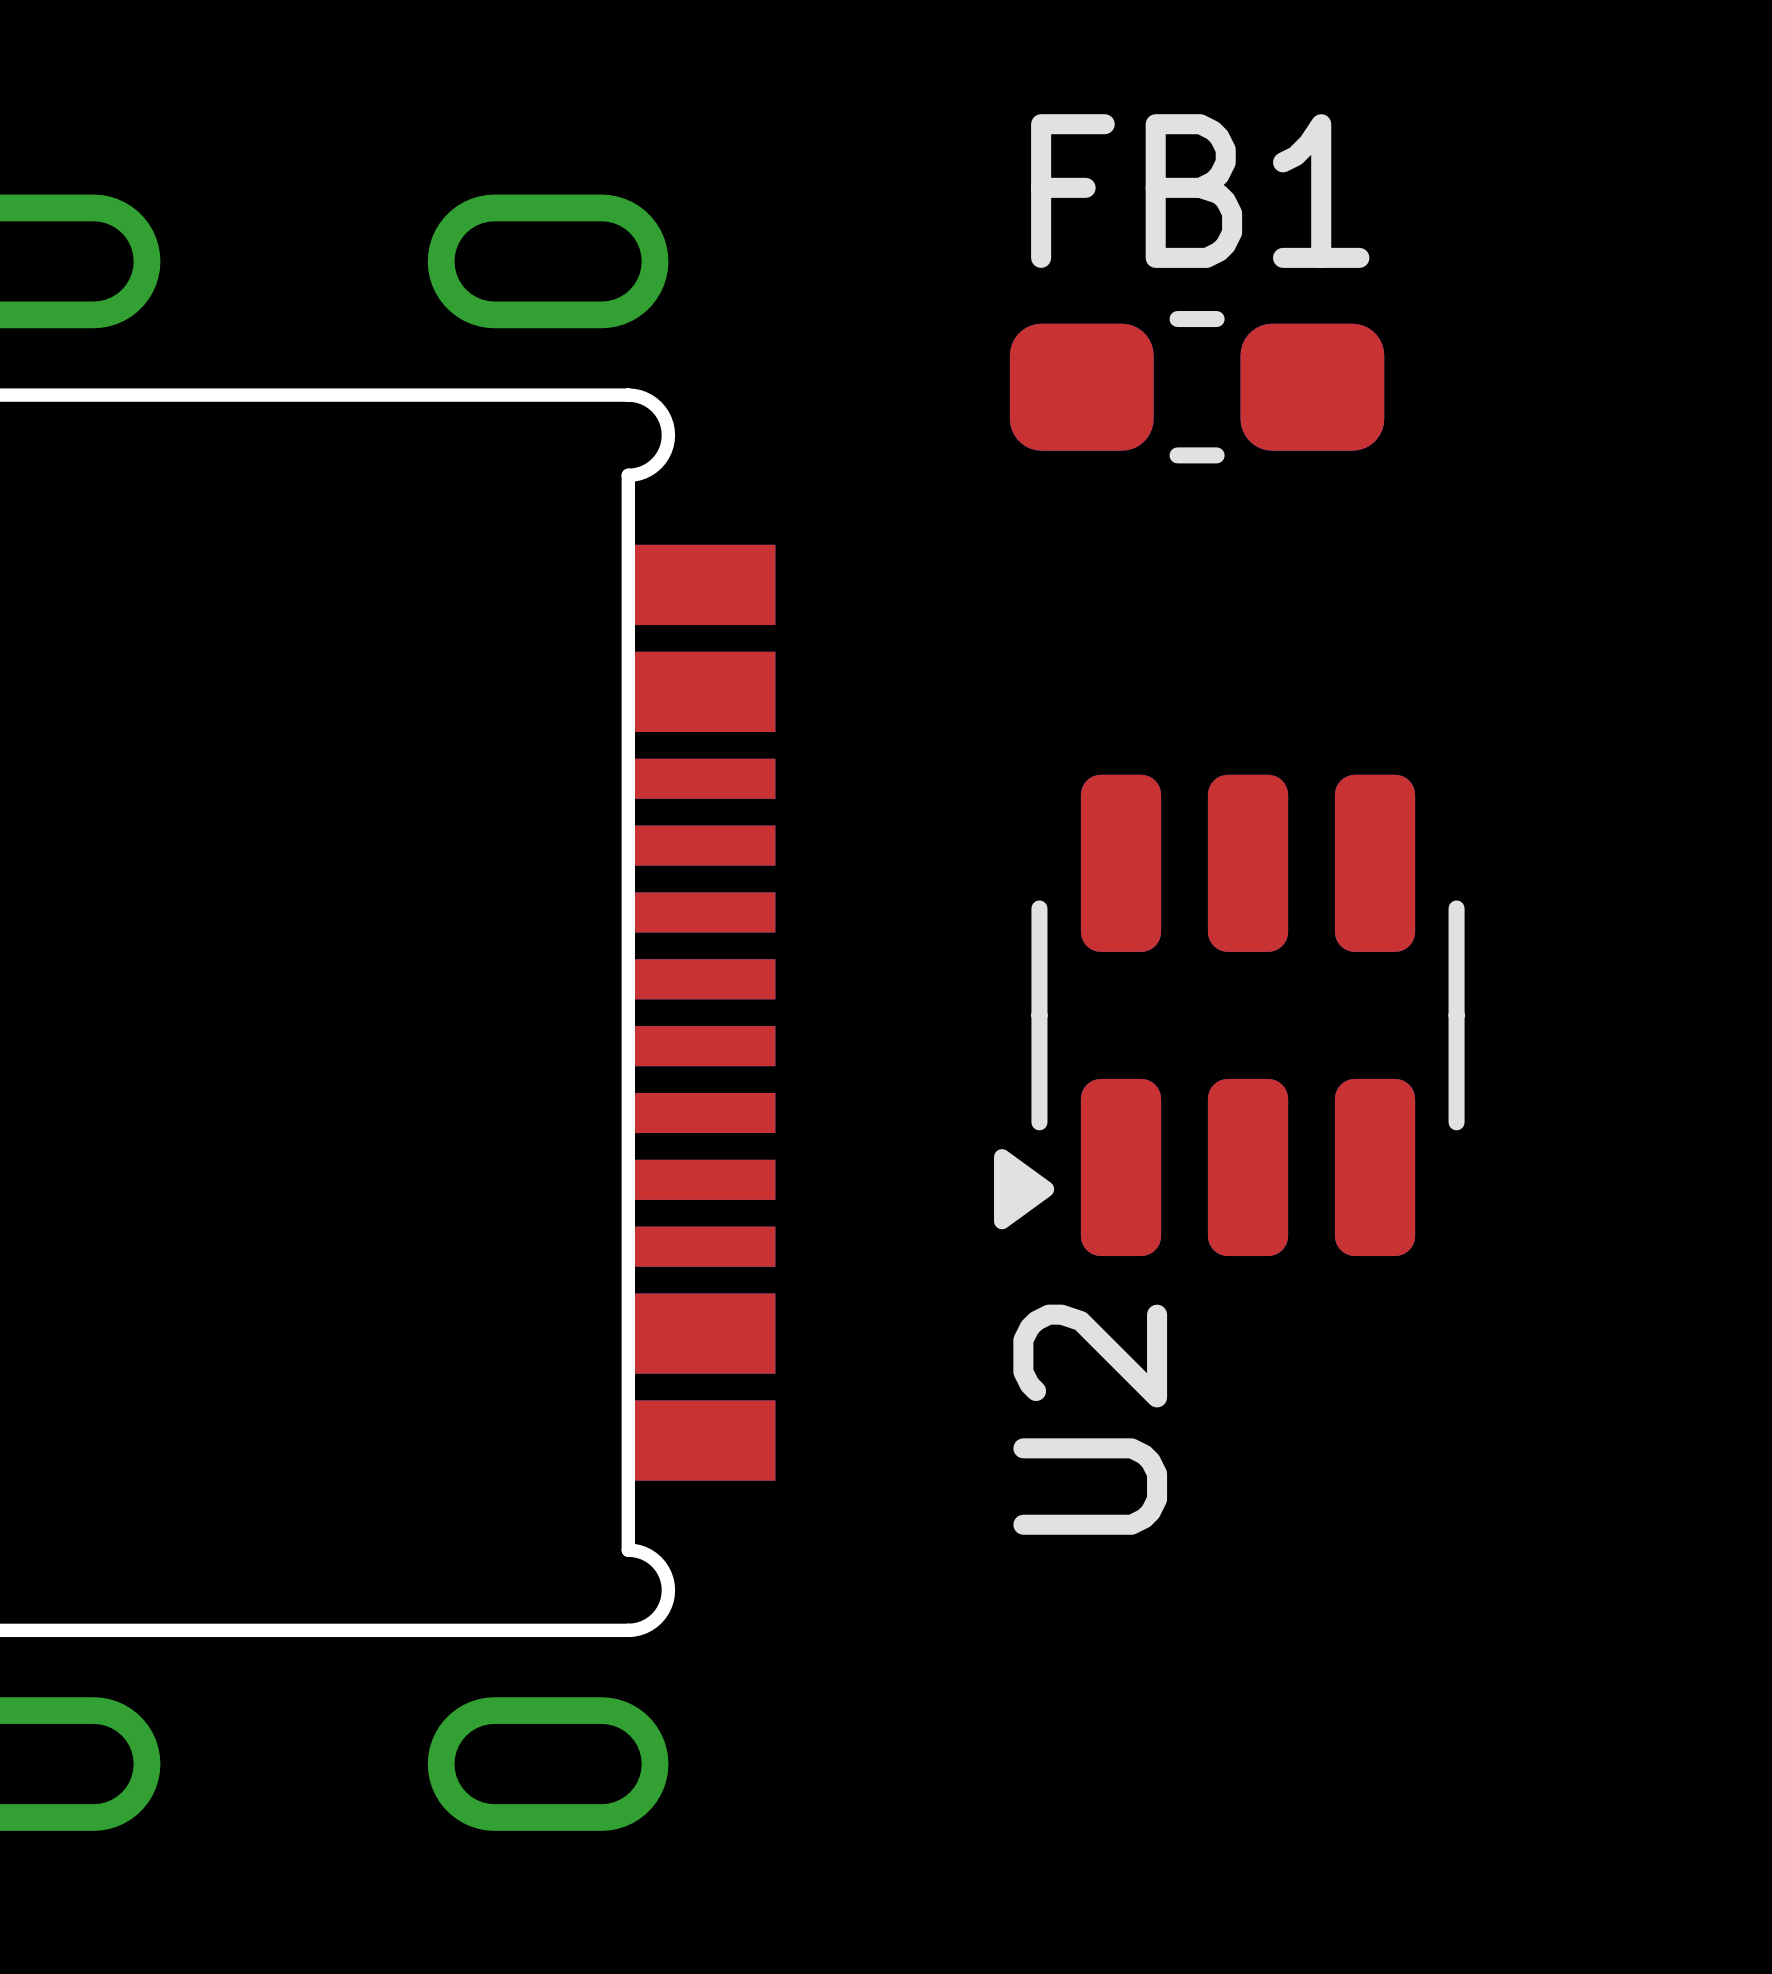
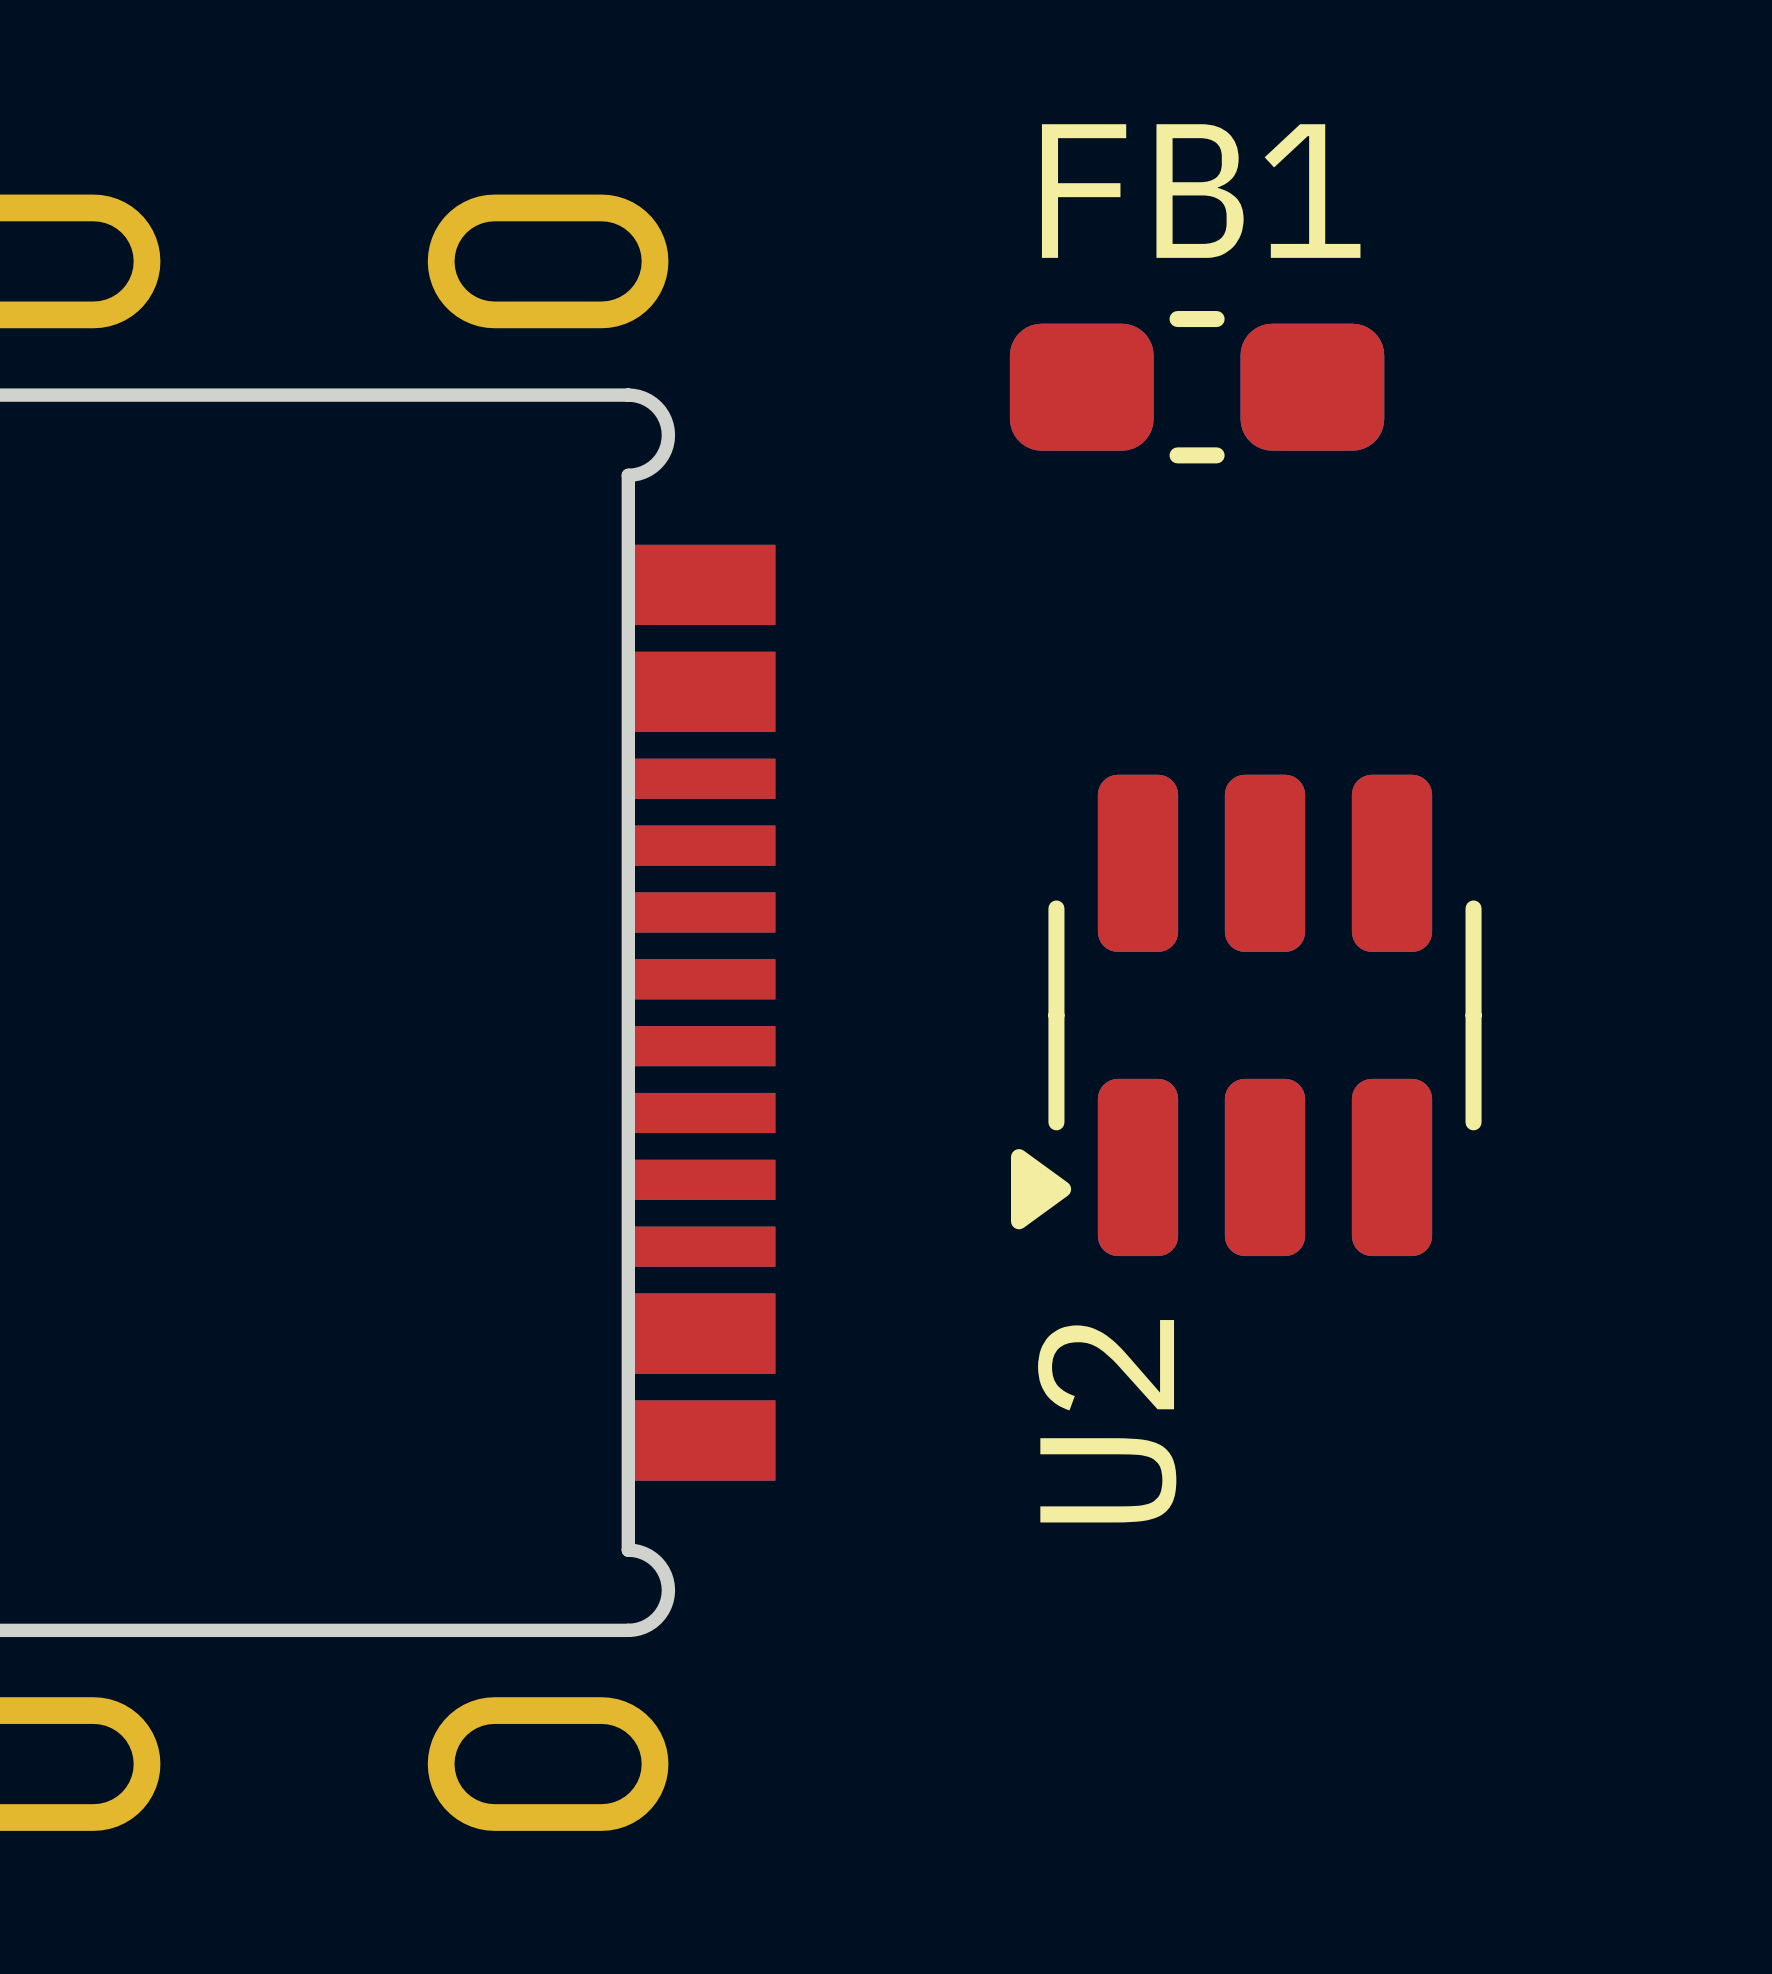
U2 position: (1229, 1015) -> (1246, 1015)

